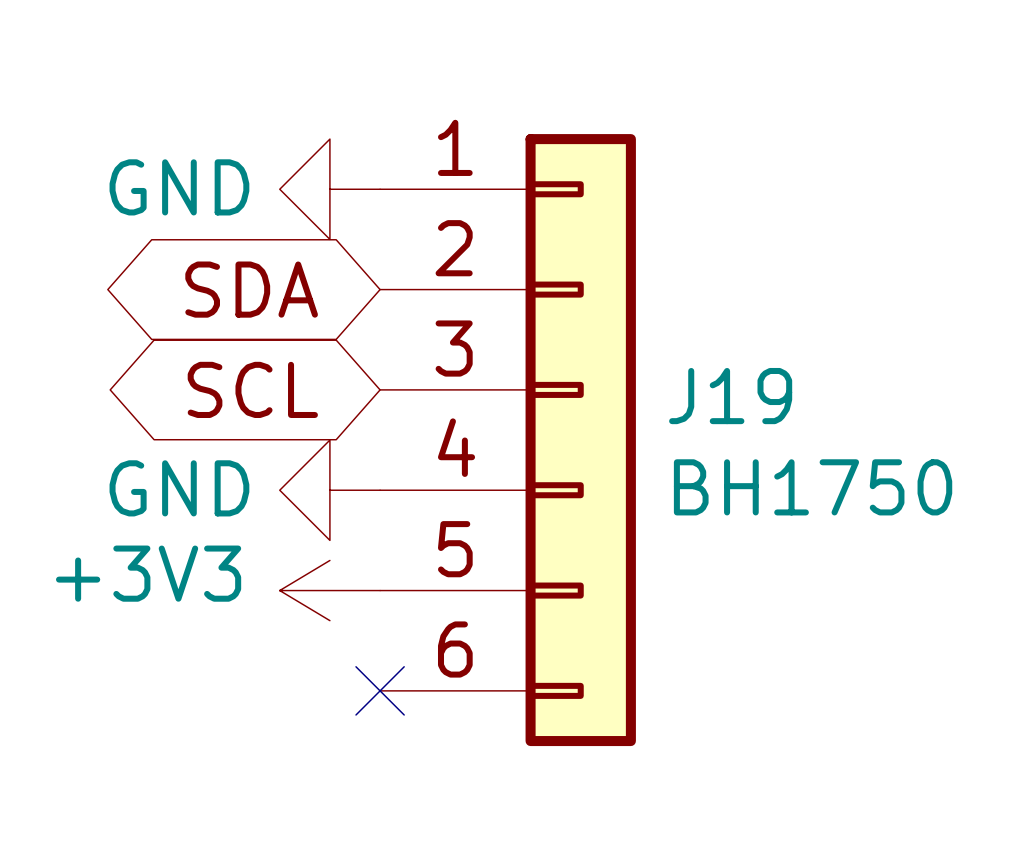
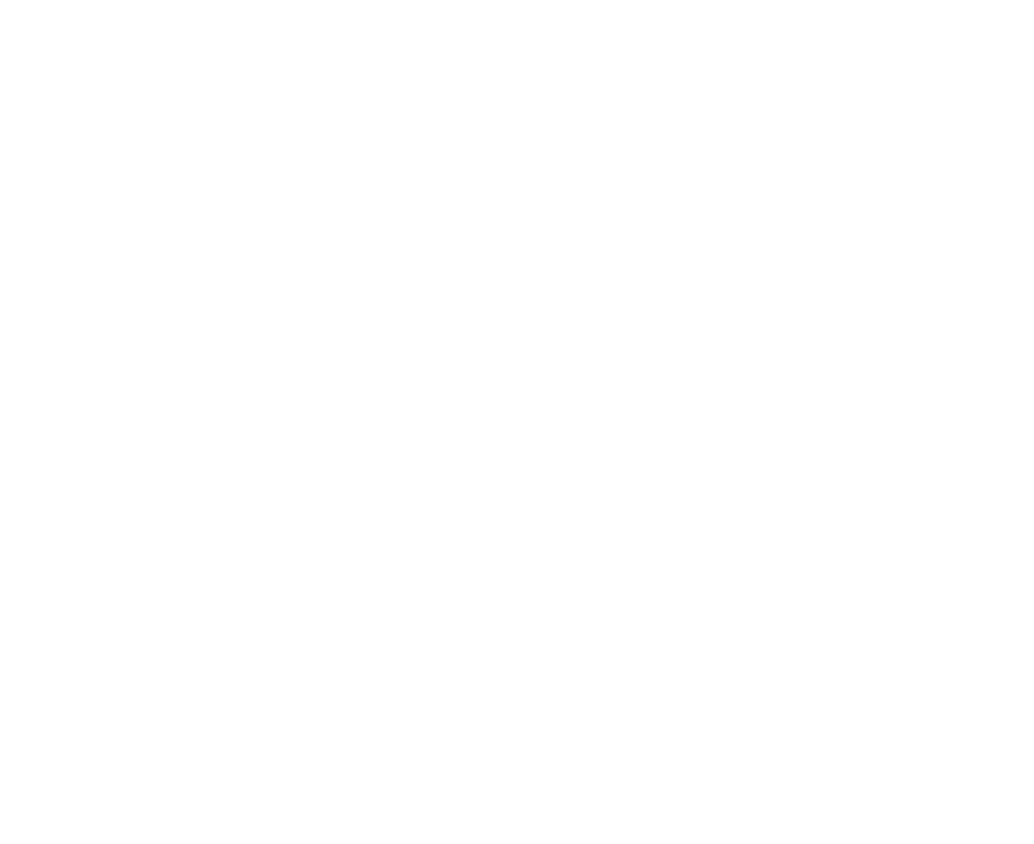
power symbol: GND (329, 189) -> none
global label: SDA (251, 289) -> none
global label: SCL (252, 389) -> none
J19: BH1750 (508, 440) -> none
power symbol: GND (329, 490) -> none
power symbol: +3V3 (329, 590) -> none
no-connect mark: (380, 690) -> none

